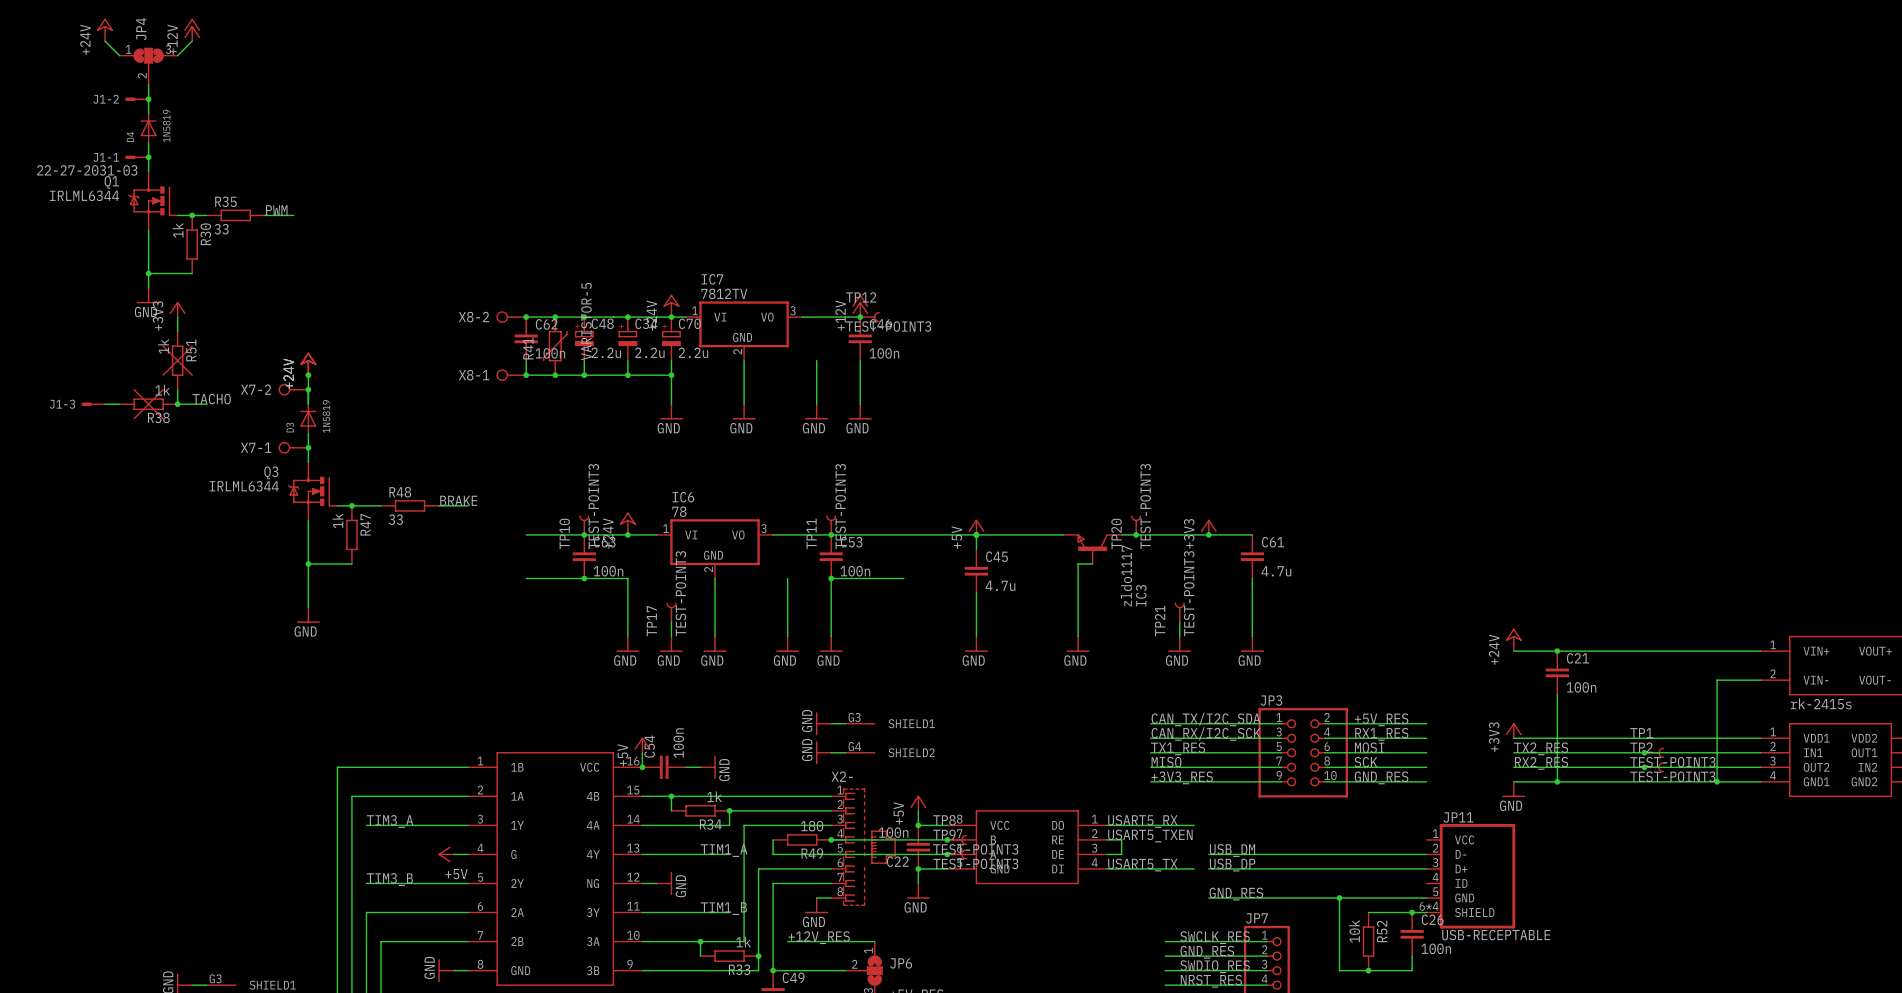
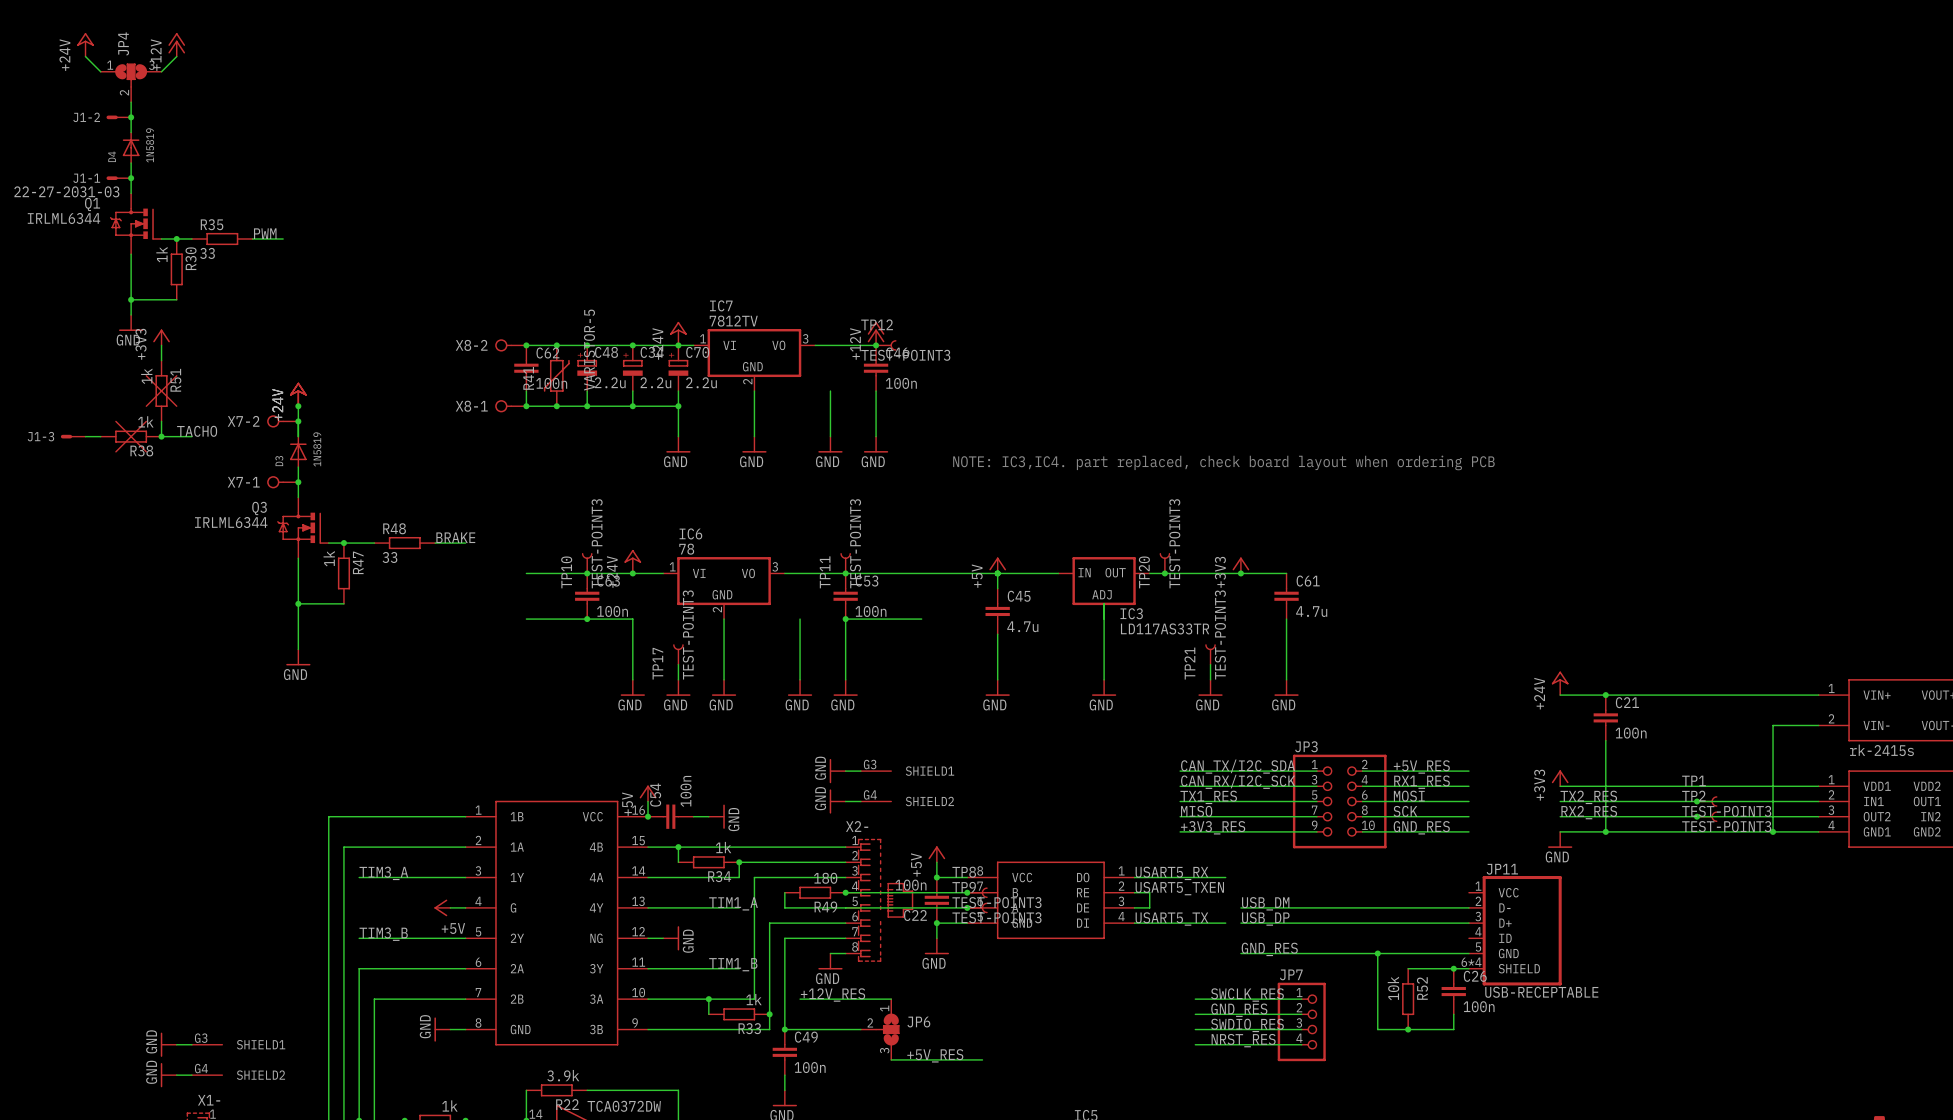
text: none -> NOTE: IC3,IC4. part replaced, check board layout when ordering PCB (1223, 462)
IC3 symbol: [1063, 534, 1122, 564] -> [1058, 557, 1150, 620]
IC3 value: zldo1117 (1126, 575) -> LD117AS33TR (1165, 628)
IC3 name position: IC3 (1141, 595) -> IC3 (1131, 613)

